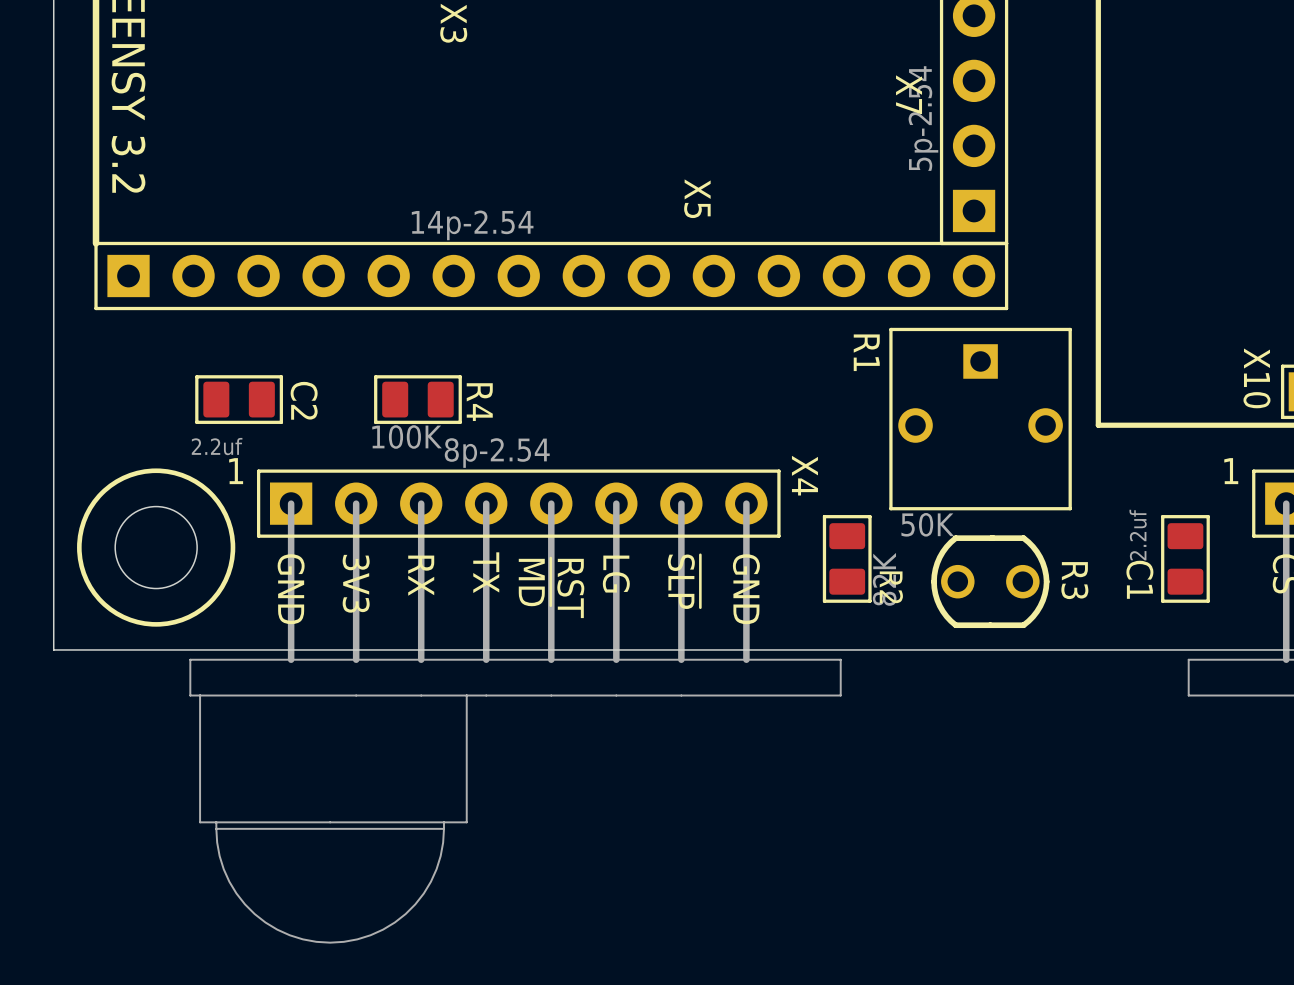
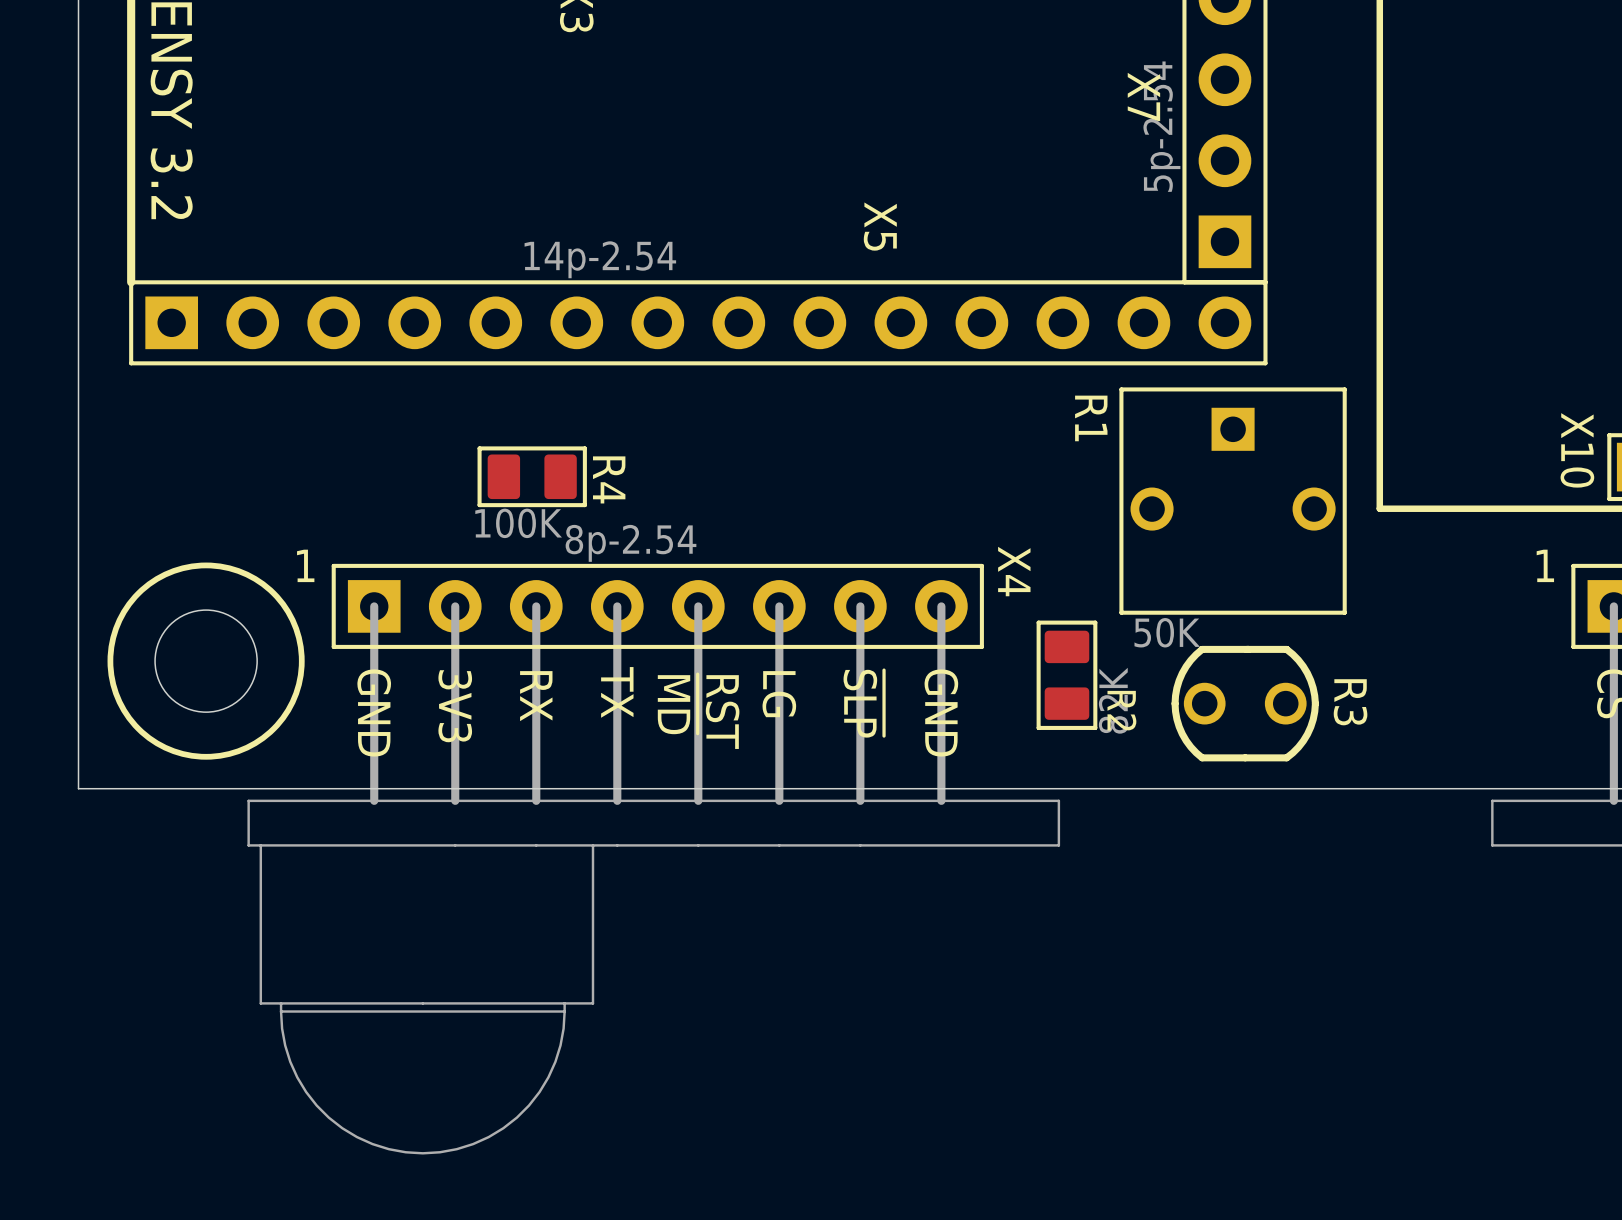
C2: 2.2uf (239, 399) -> none
C1: 2.2uf (1185, 558) -> none

